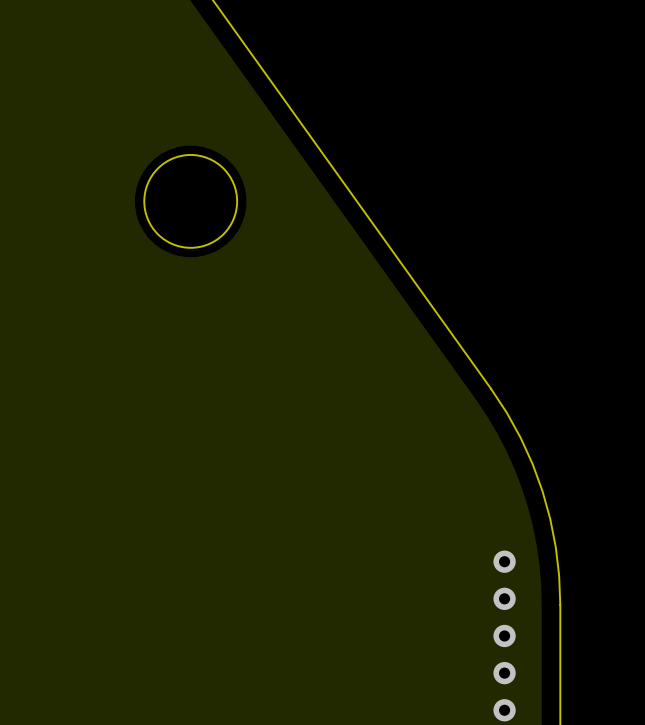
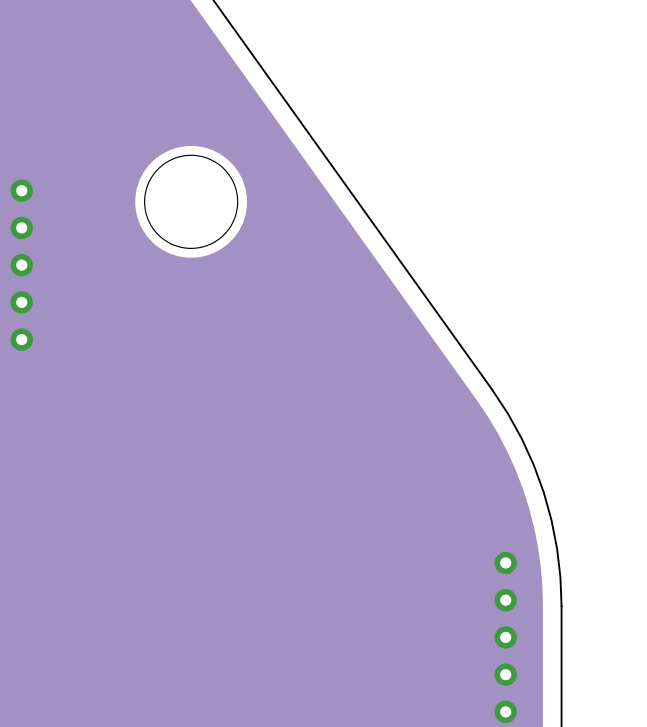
via: none -> (21, 190)
via: none -> (21, 227)
via: none -> (21, 265)
via: none -> (21, 302)
via: none -> (21, 339)

